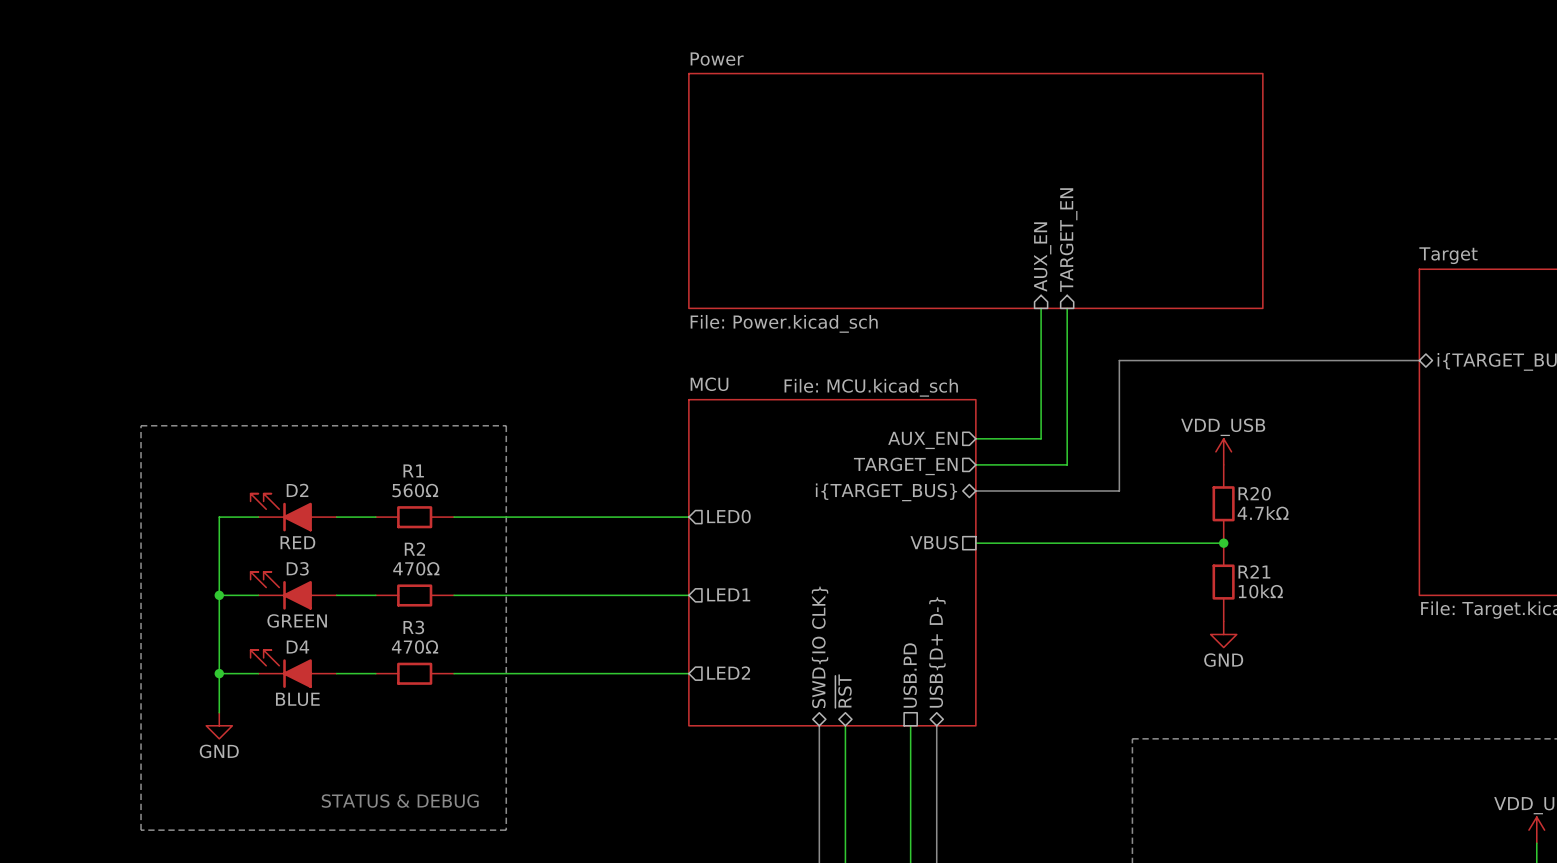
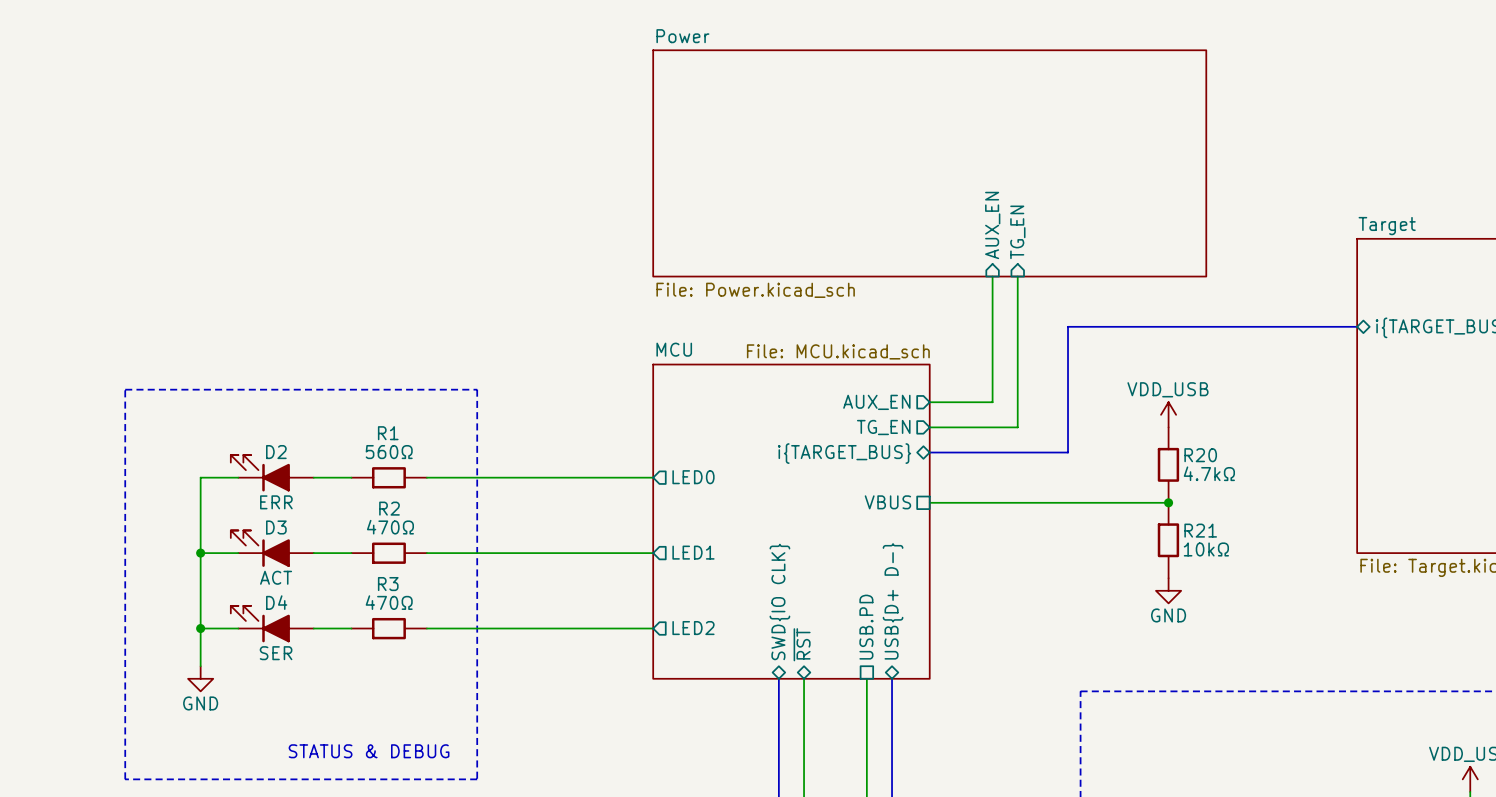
sheet pin: TARGET_EN (1068, 240) -> TG_EN (1017, 232)
sheet pin: TARGET_EN (905, 466) -> TG_EN (883, 427)
D2 value: RED (297, 542) -> ERR (276, 502)
D3 value: GREEN (297, 620) -> ACT (276, 577)
D4 value: BLUE (297, 699) -> SER (276, 653)

